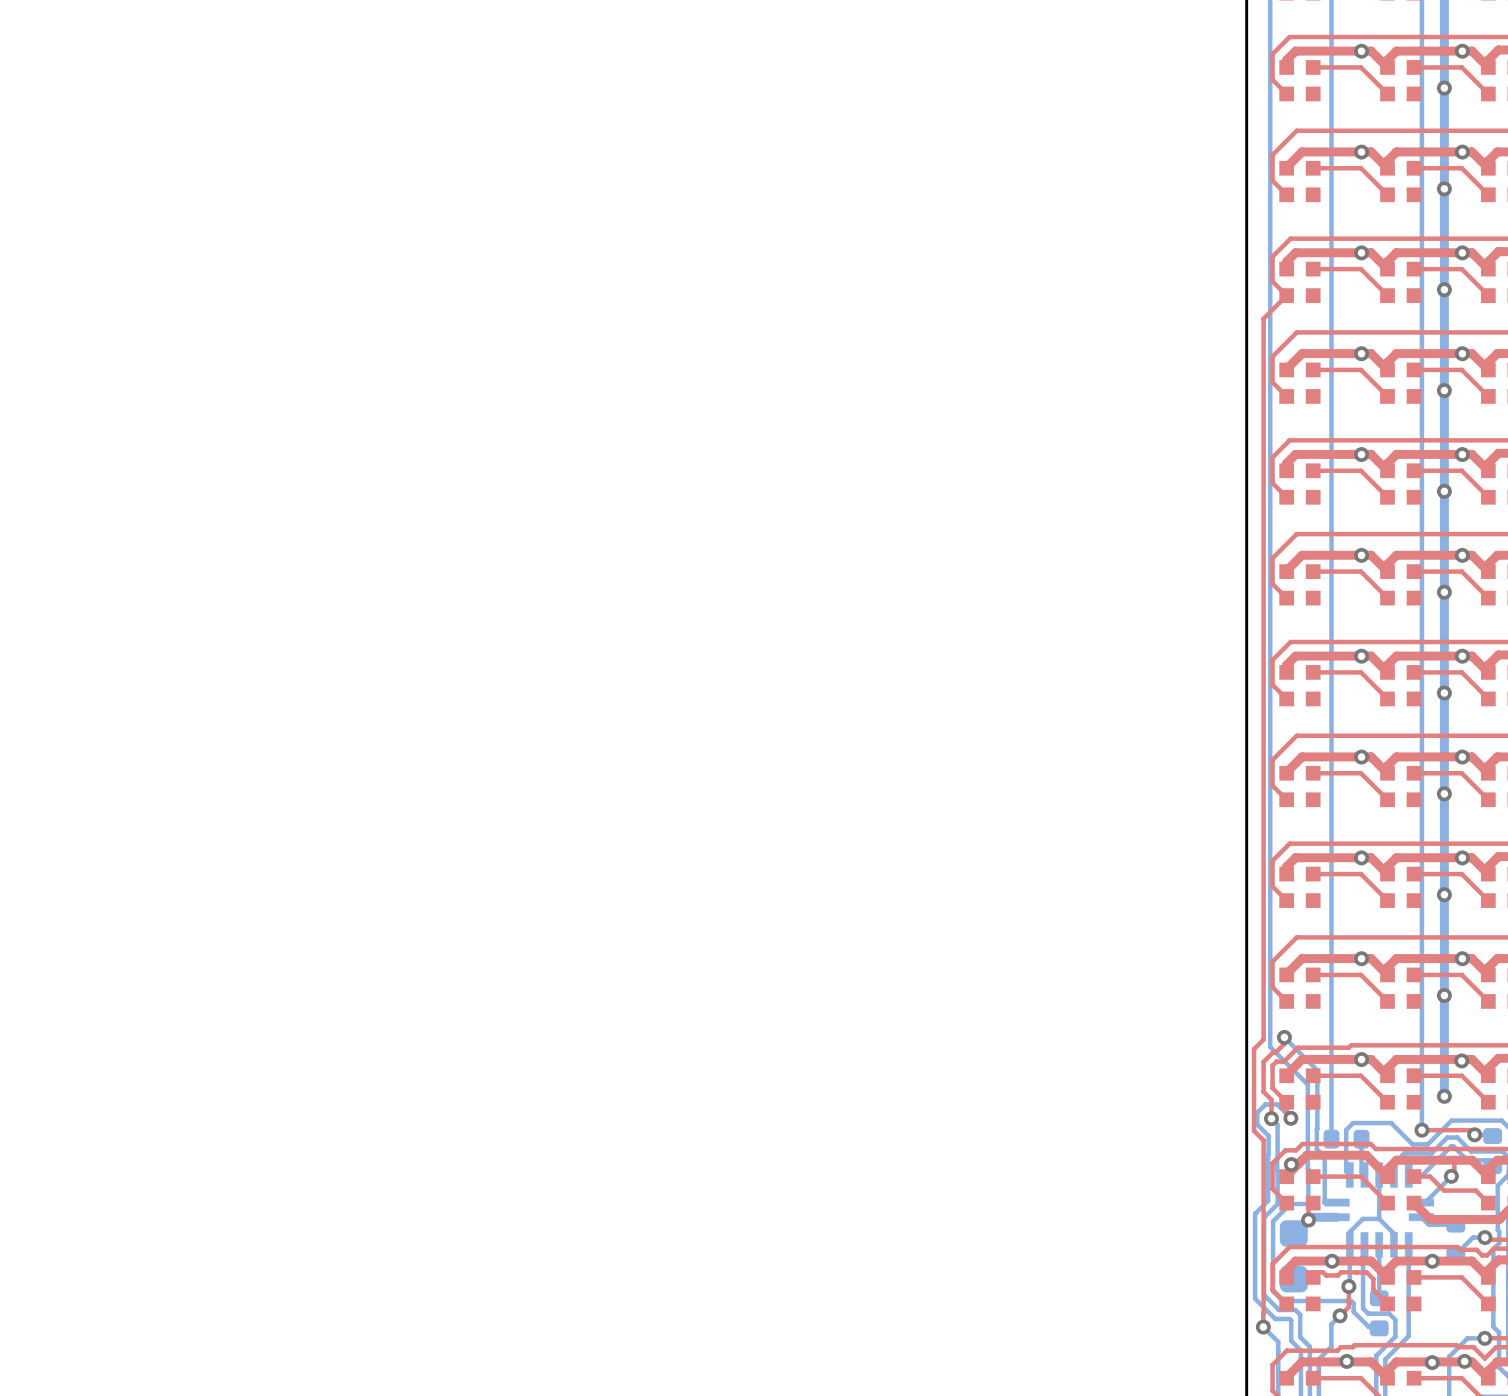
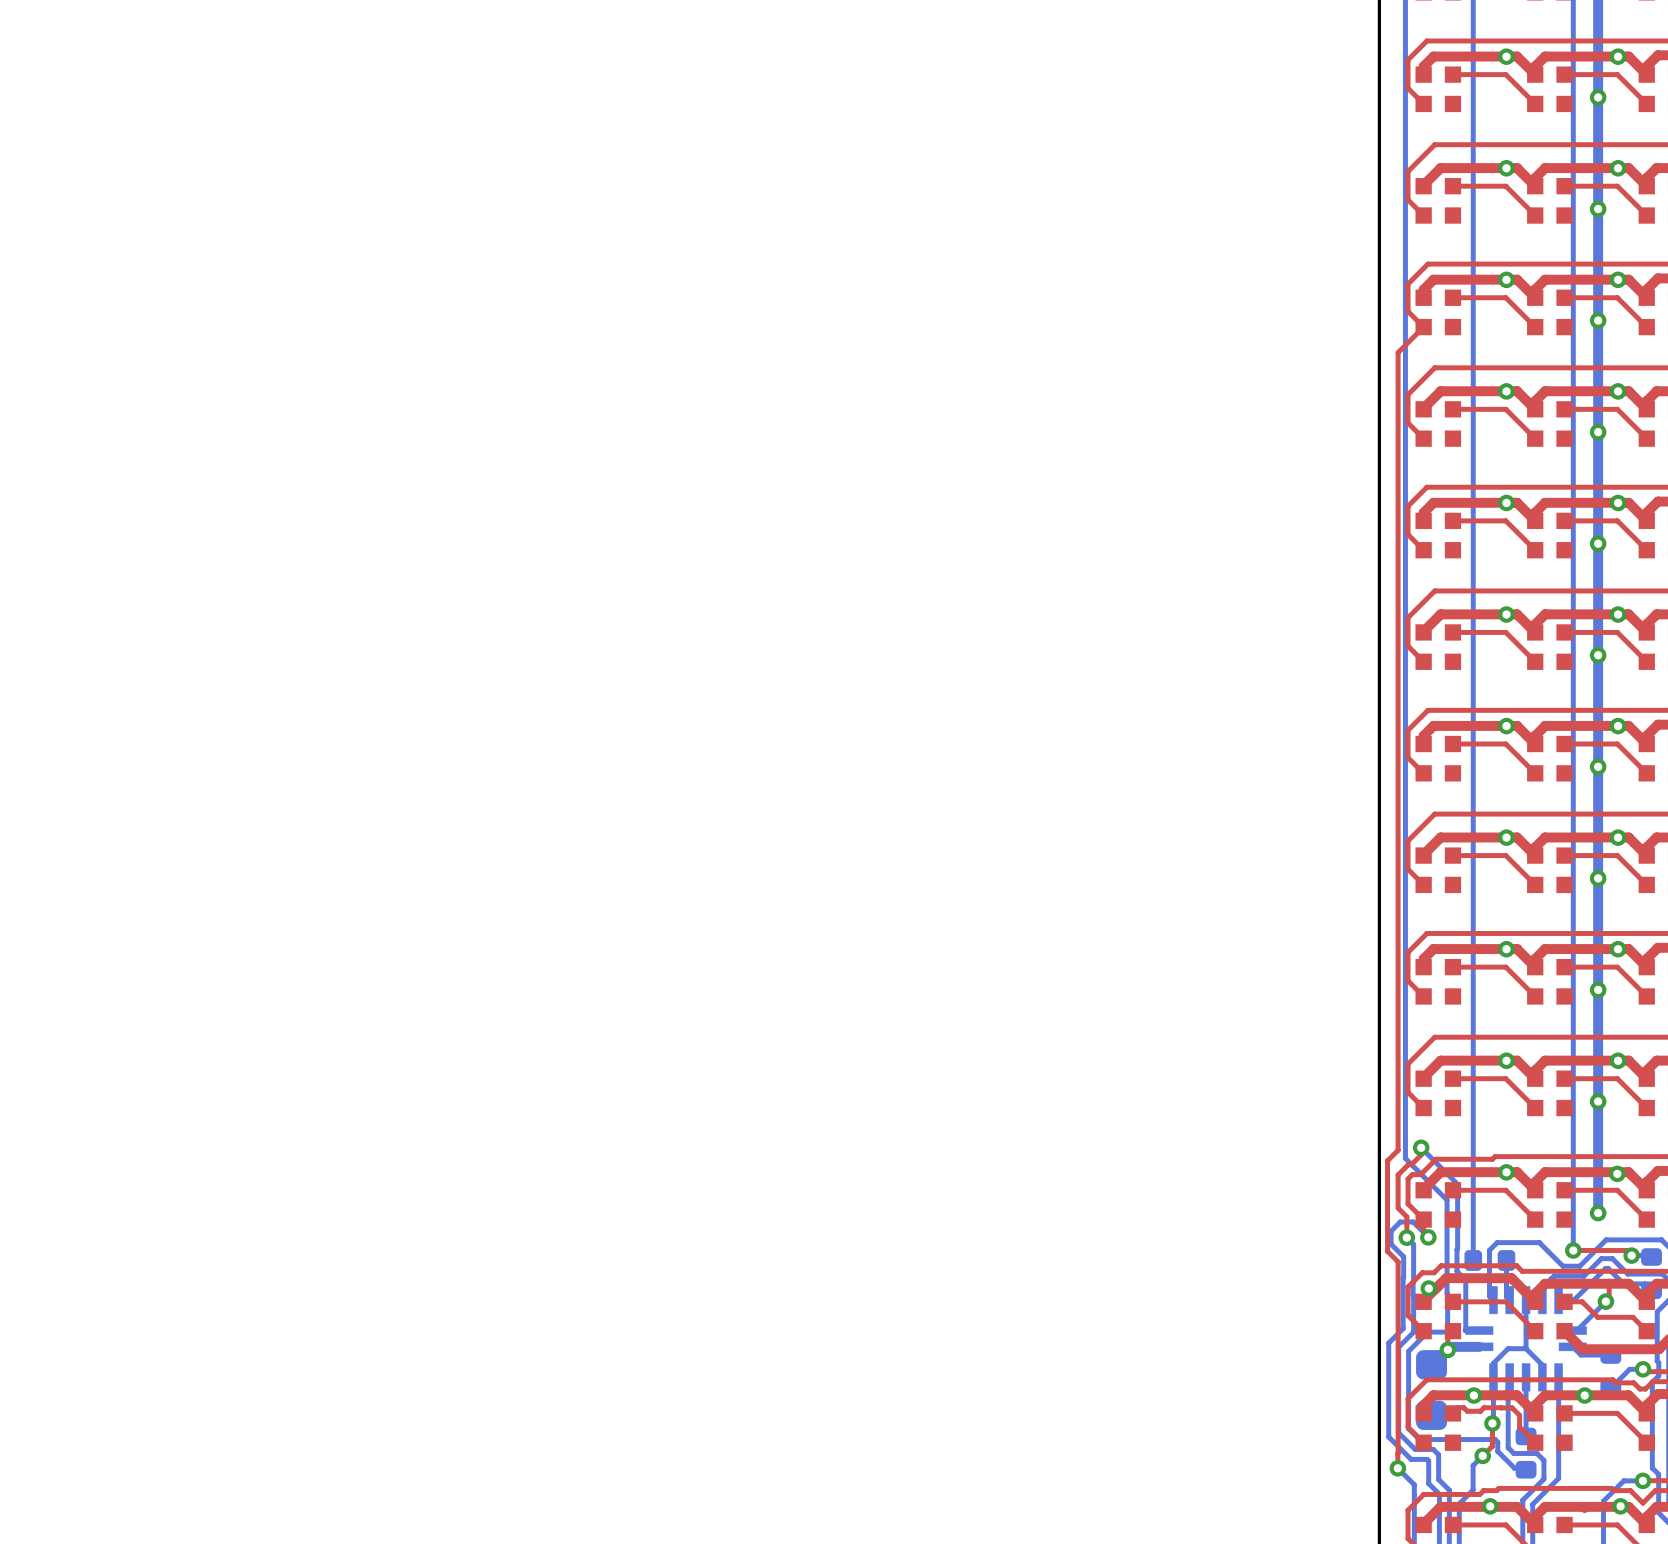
via: (1432, 1362) -> none

